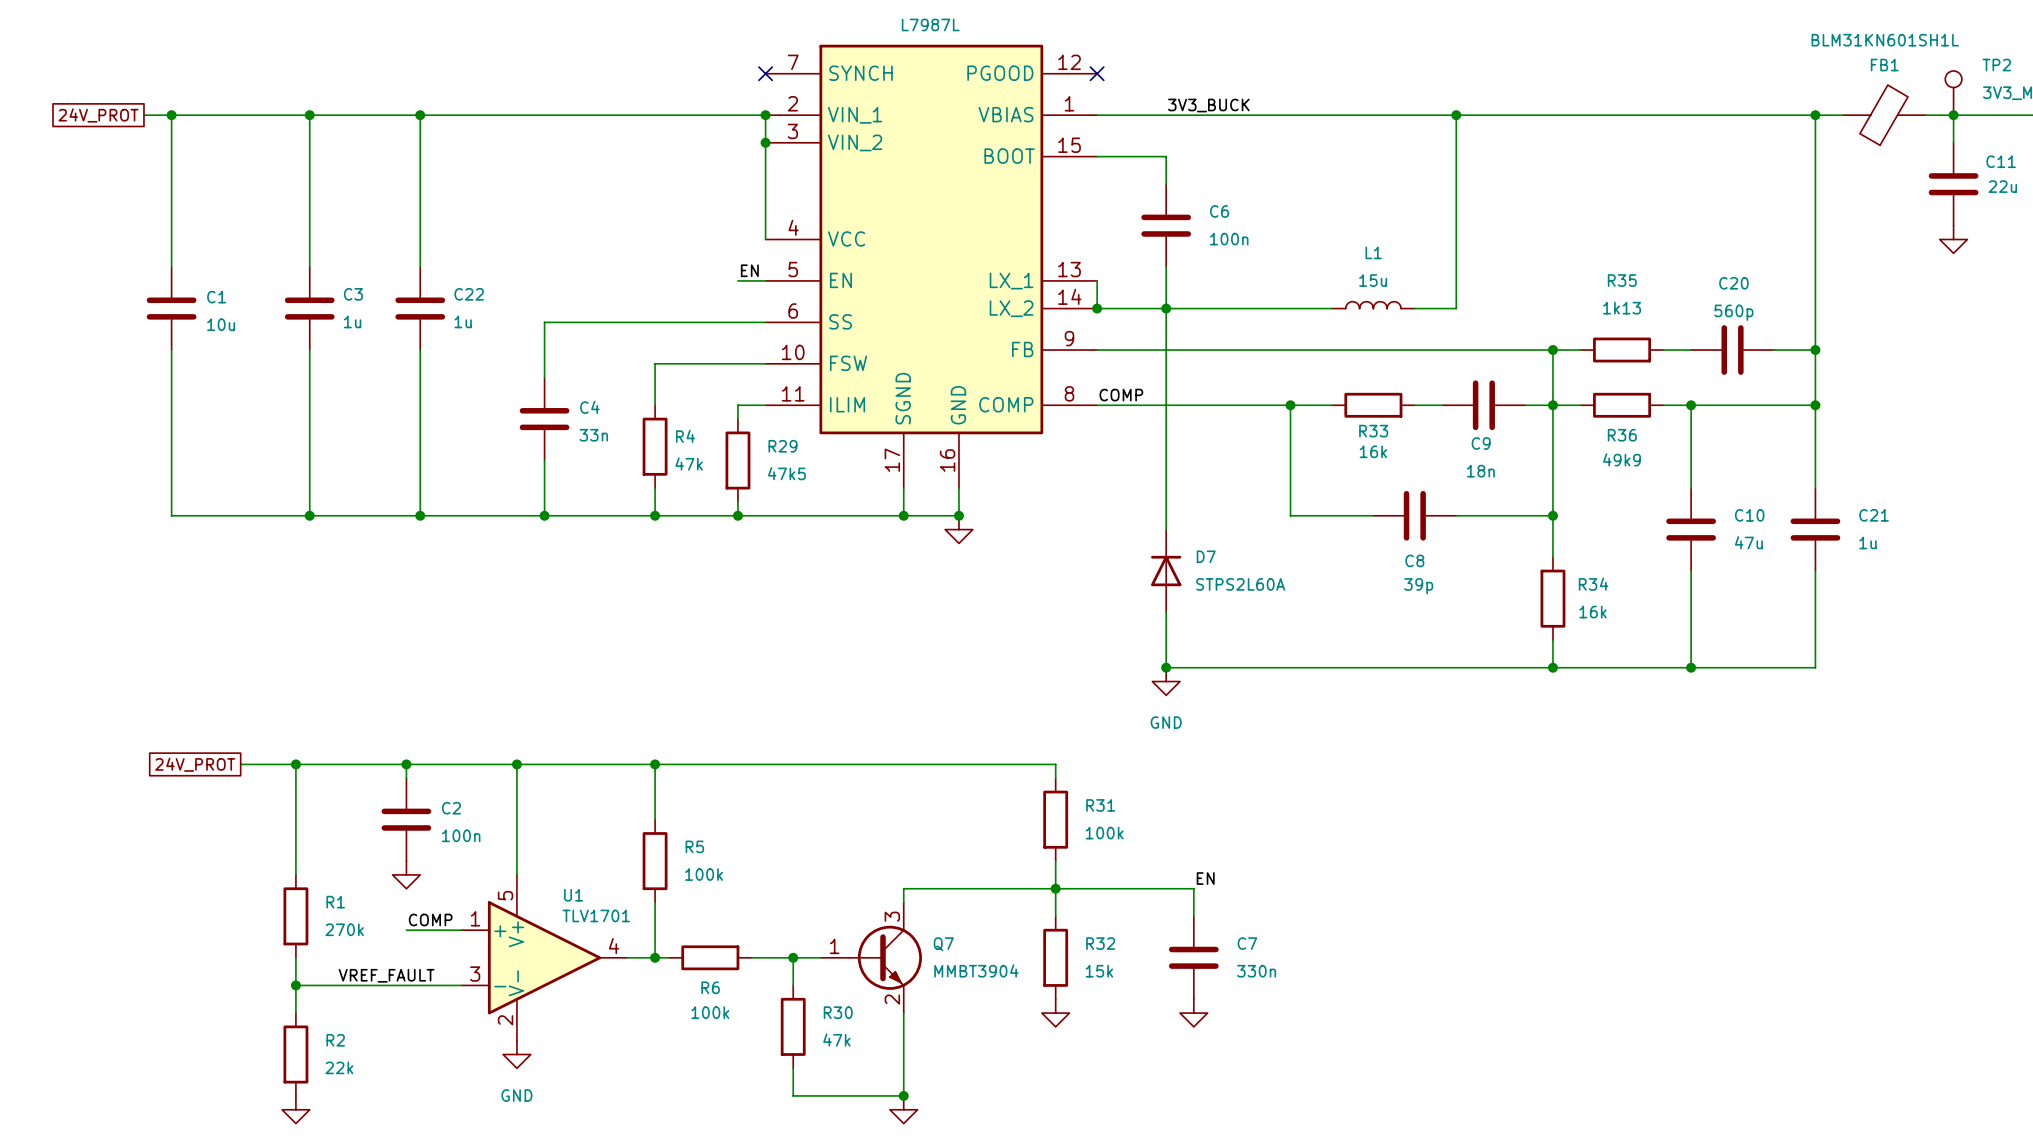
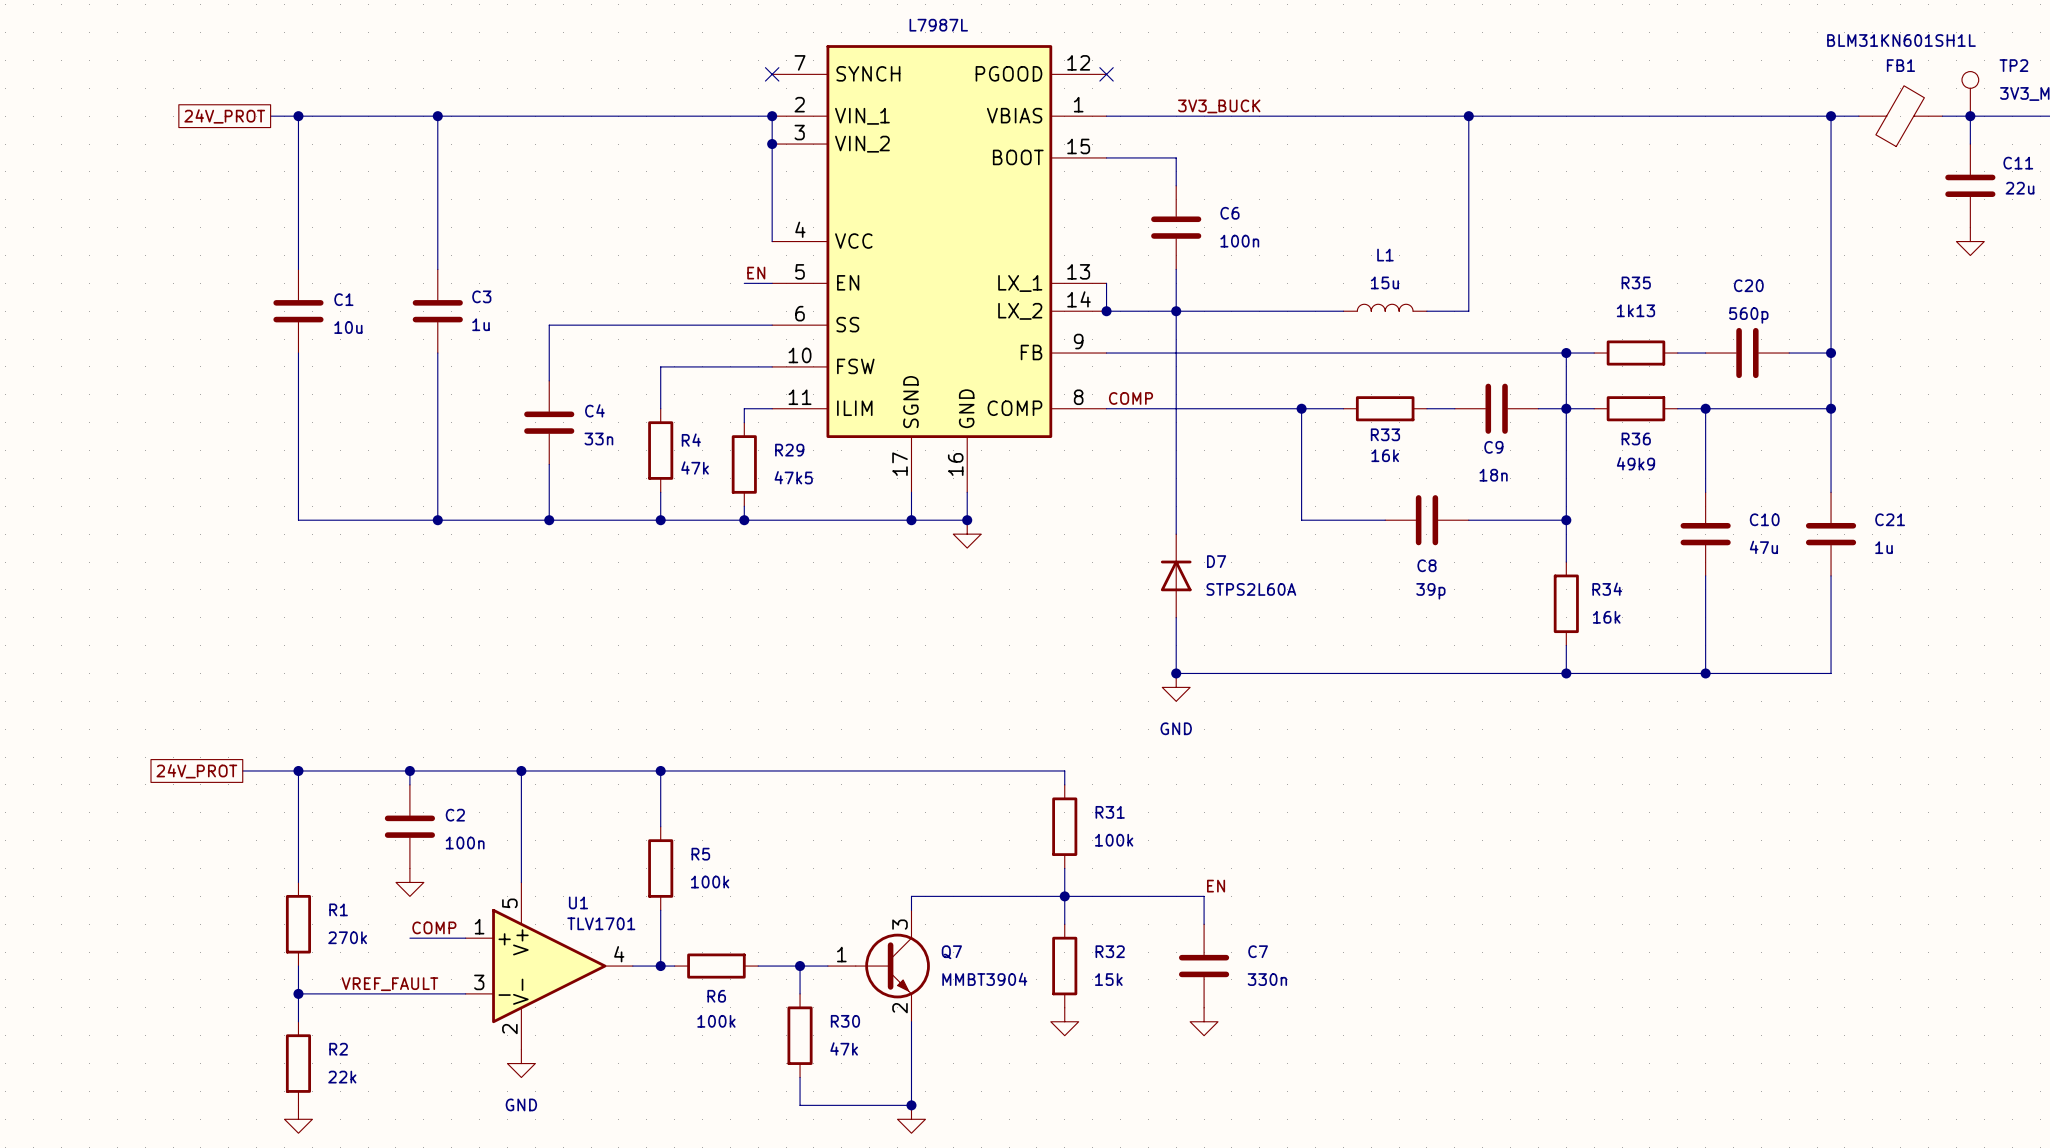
global label position: 24V_PROT (98, 115) -> 24V_PROT (224, 116)
wire: (143, 115) (268, 115) -> none
wire: (171, 115) (171, 267) -> (298, 116) (298, 269)
junction: (171, 115) -> none
wire: (309, 115) (309, 267) -> (437, 116) (437, 269)
junction position: (309, 115) -> (298, 116)
wire: (420, 115) (420, 267) -> none
junction position: (420, 115) -> (437, 116)
C1 position: (171, 308) -> (298, 311)
C3 position: (309, 308) -> (437, 311)
C22: 1u (420, 308) -> none
wire: (171, 350) (171, 515) (295, 515) -> (298, 353) (298, 520)
wire: (309, 350) (309, 515) -> (437, 353) (437, 520)
wire: (420, 350) (420, 515) -> none
junction: (309, 515) -> none
junction position: (420, 515) -> (437, 520)

